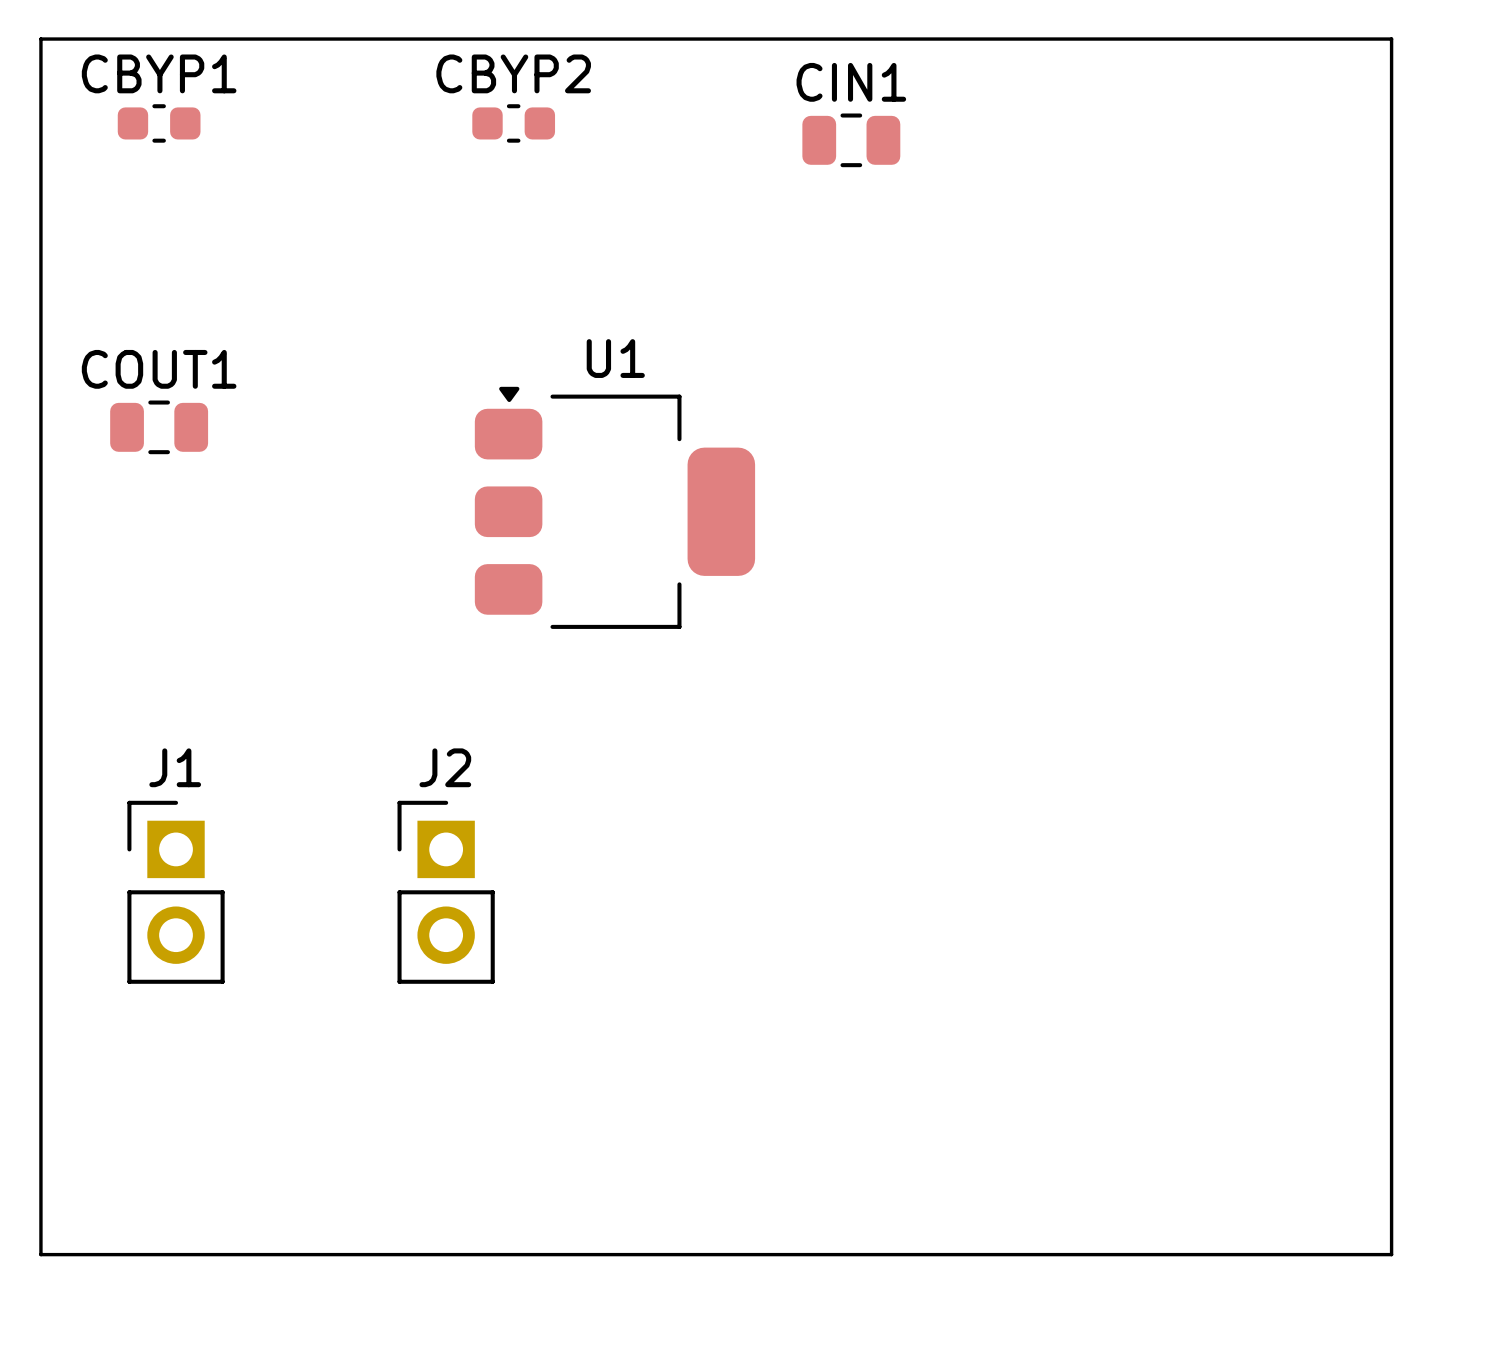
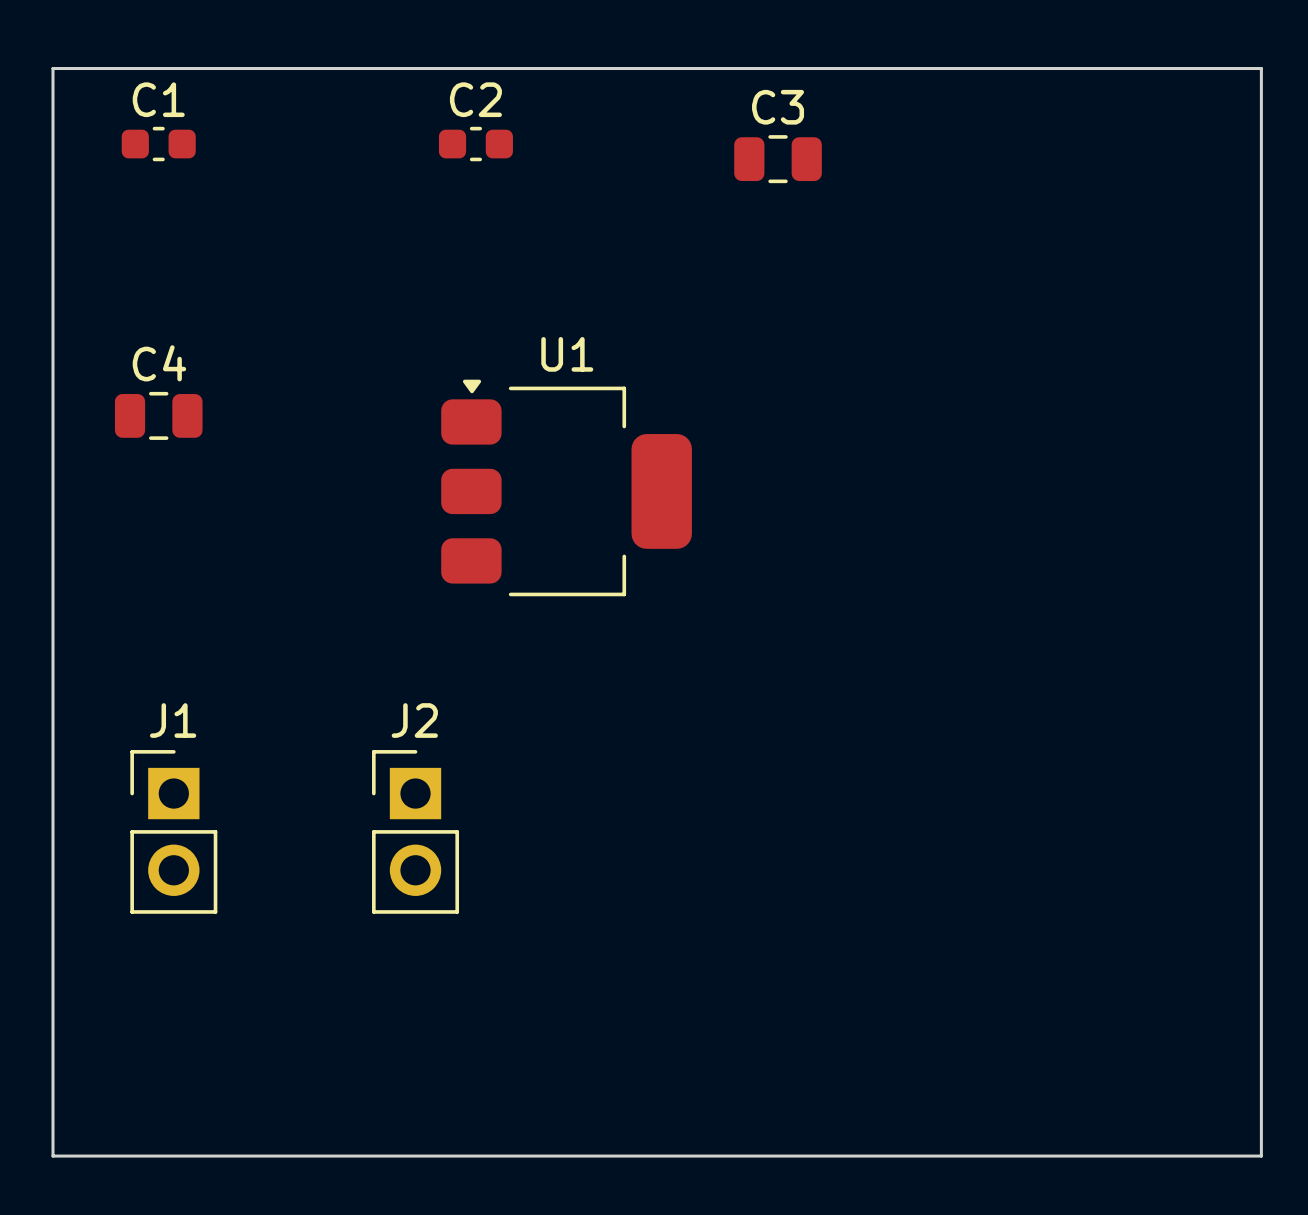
CBYP1 name: CBYP1 (159, 73) -> C1 (158, 99)
CBYP2 name: CBYP2 (513, 73) -> C2 (475, 99)
CIN1 name: CIN1 (851, 82) -> C3 (778, 107)
COUT1 name: COUT1 (159, 369) -> C4 (159, 363)

